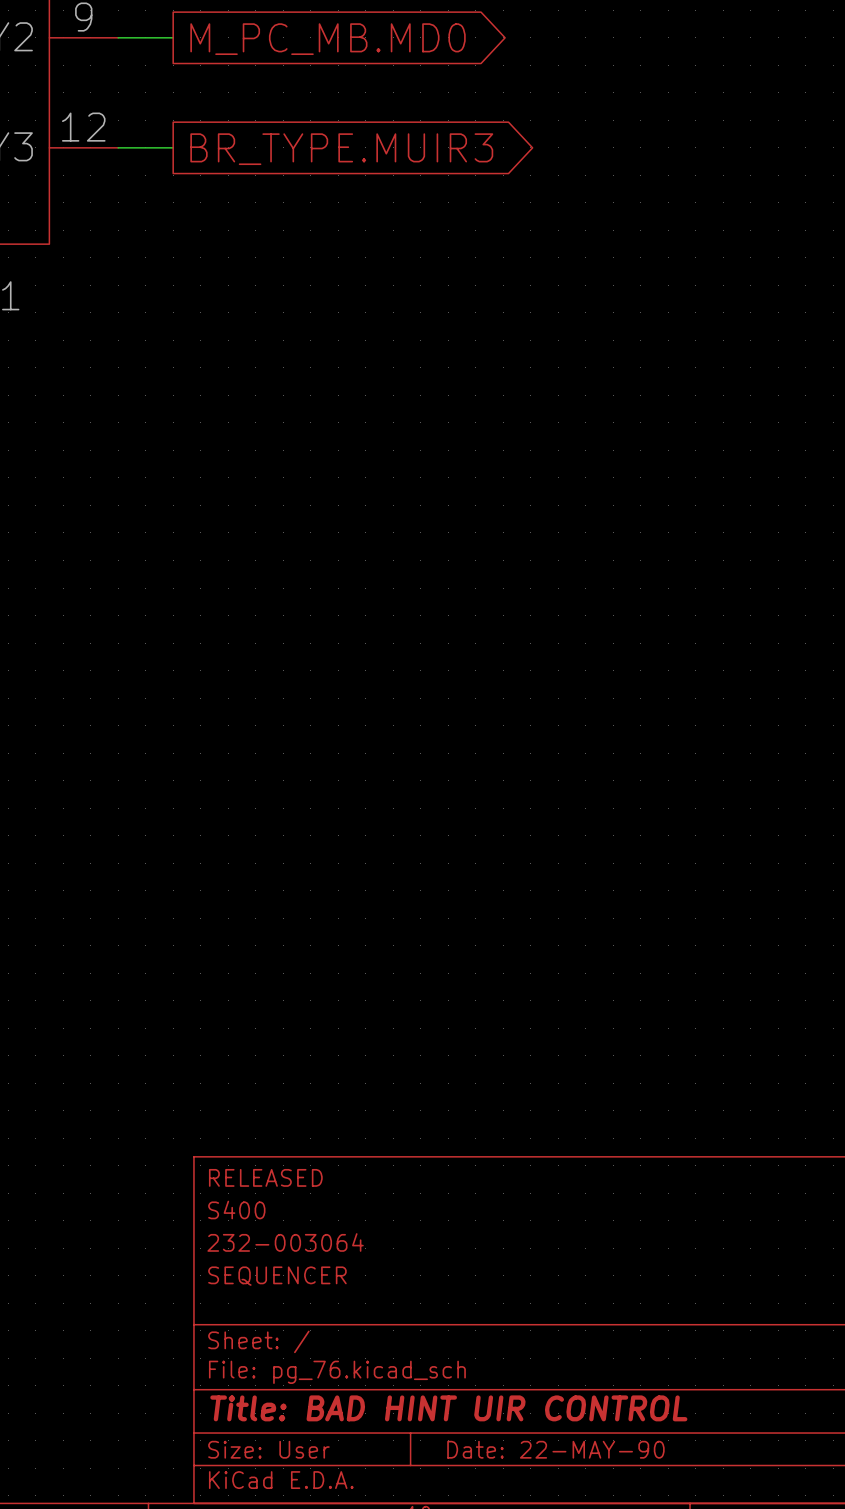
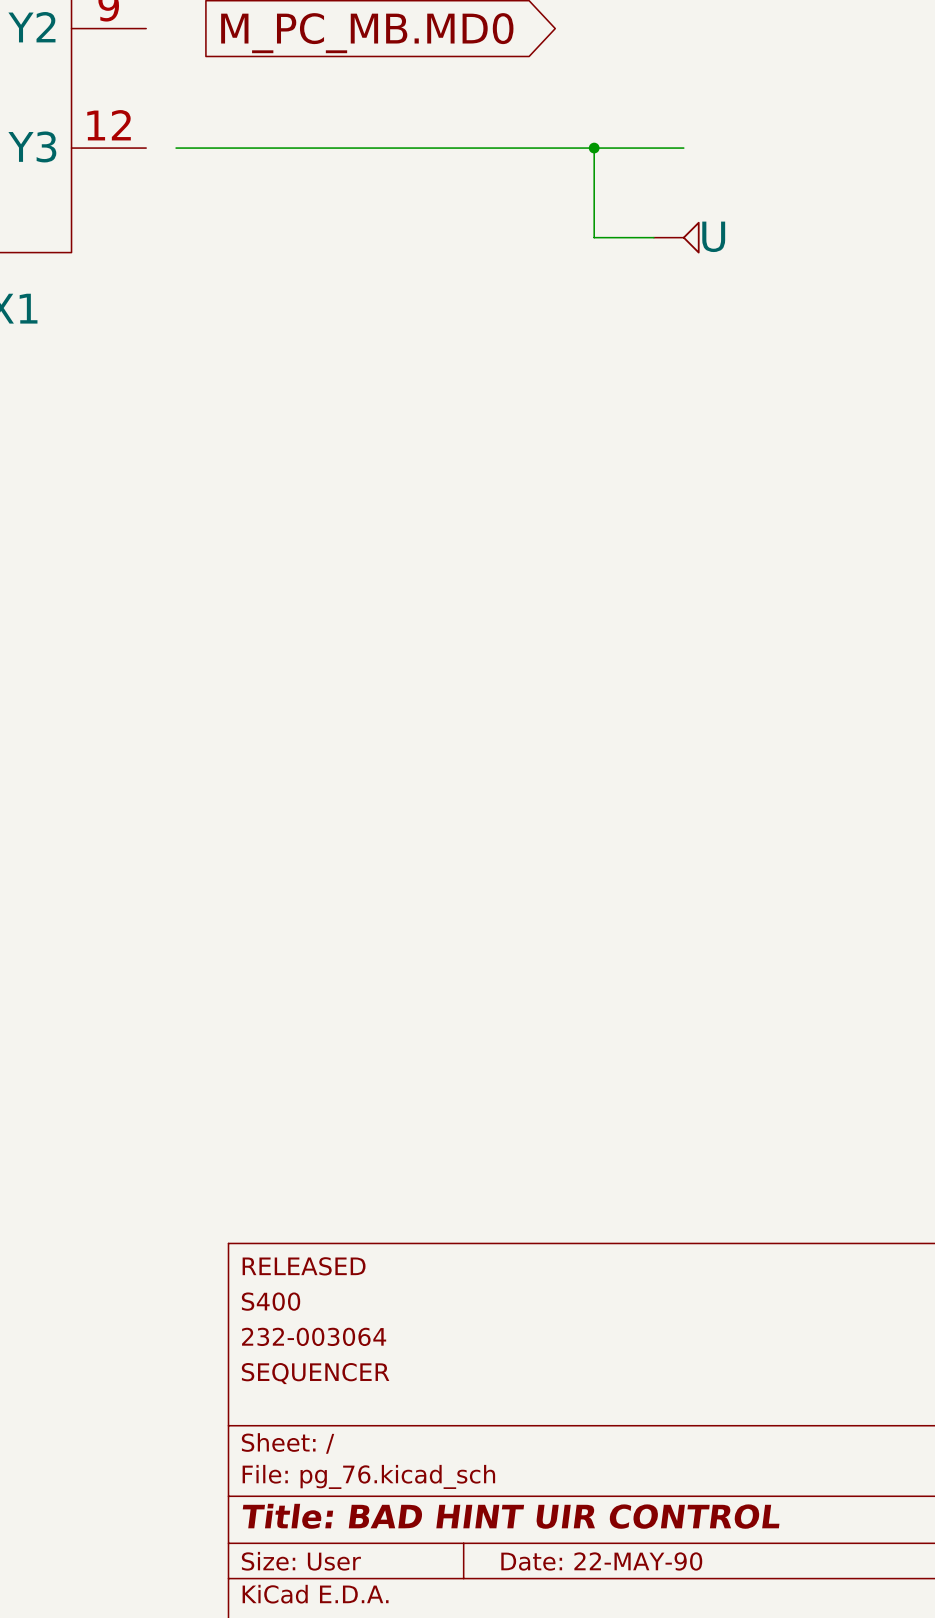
wire: (118, 37) (173, 37) -> none
wire: (118, 147) (145, 147) -> none
wire: none -> (205, 148) (683, 148)
wire: none -> (594, 148) (594, 237) (653, 237)
junction: none -> (594, 148)
global label: BR_TYPE.MUIR3 (341, 149) -> none
U: none -> (676, 237)

